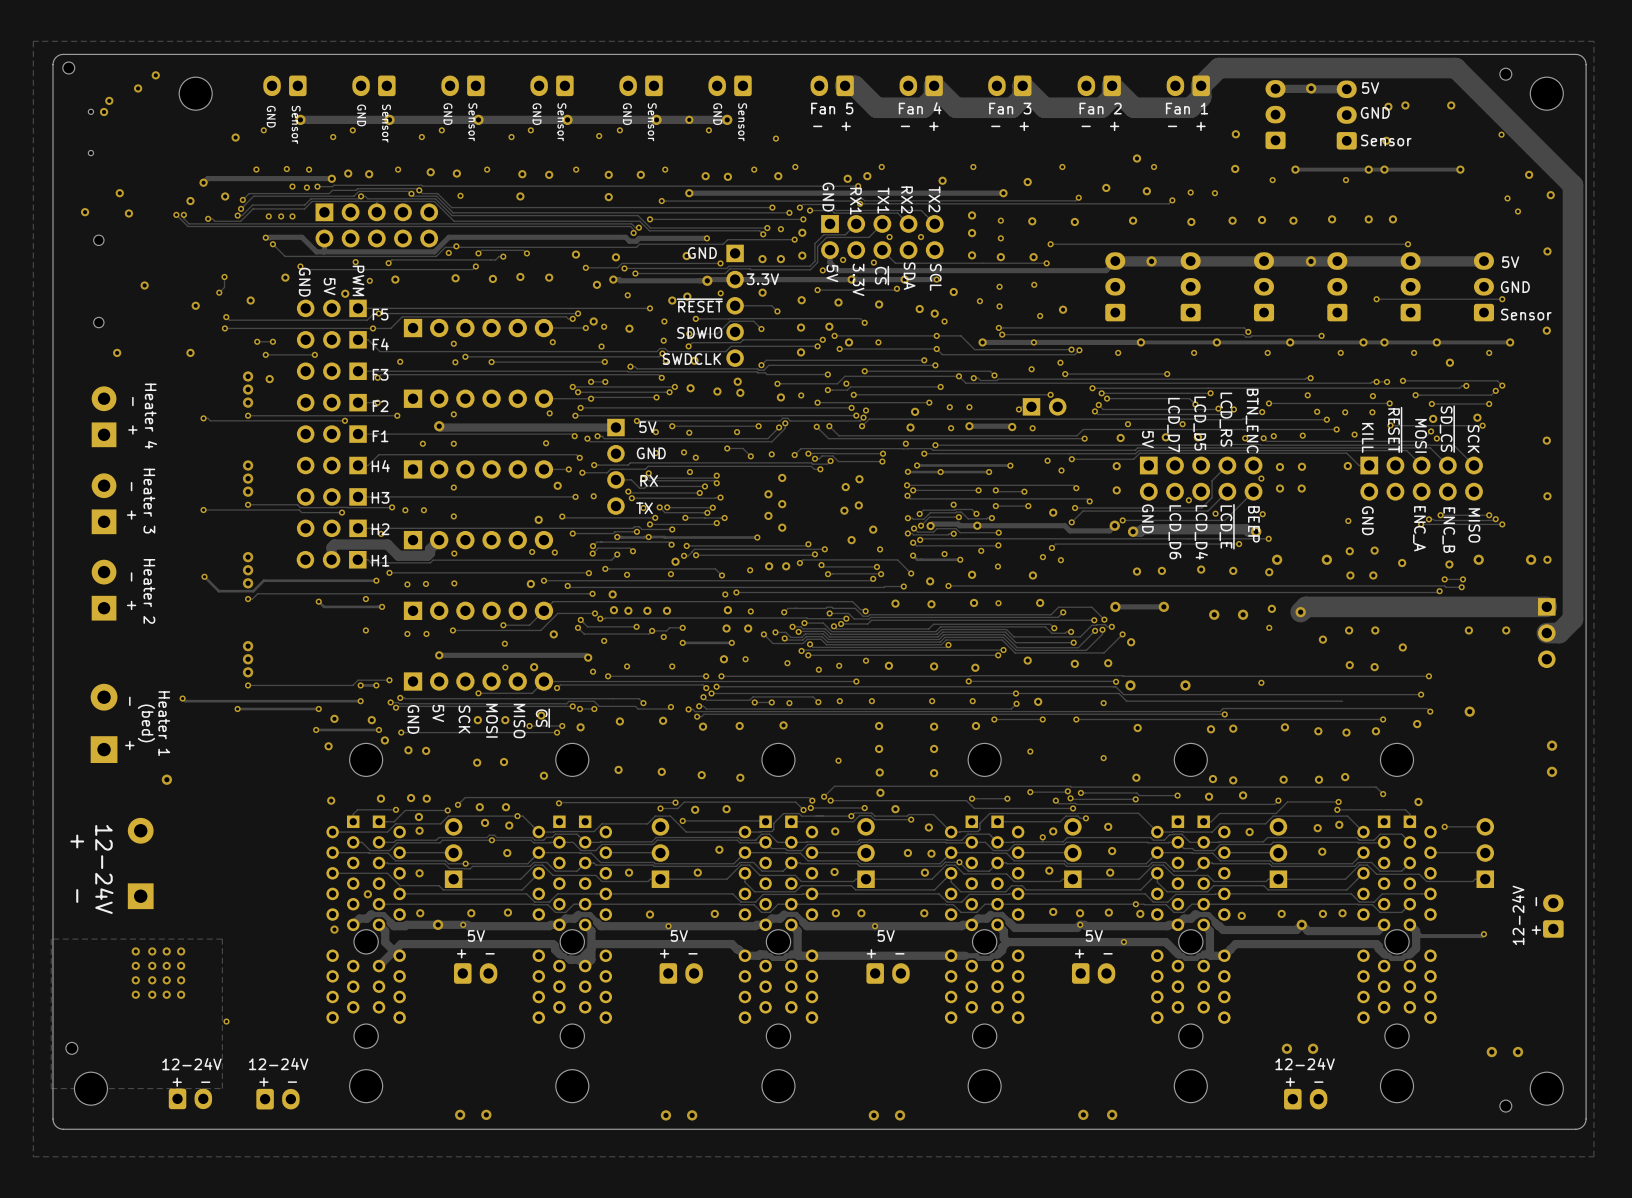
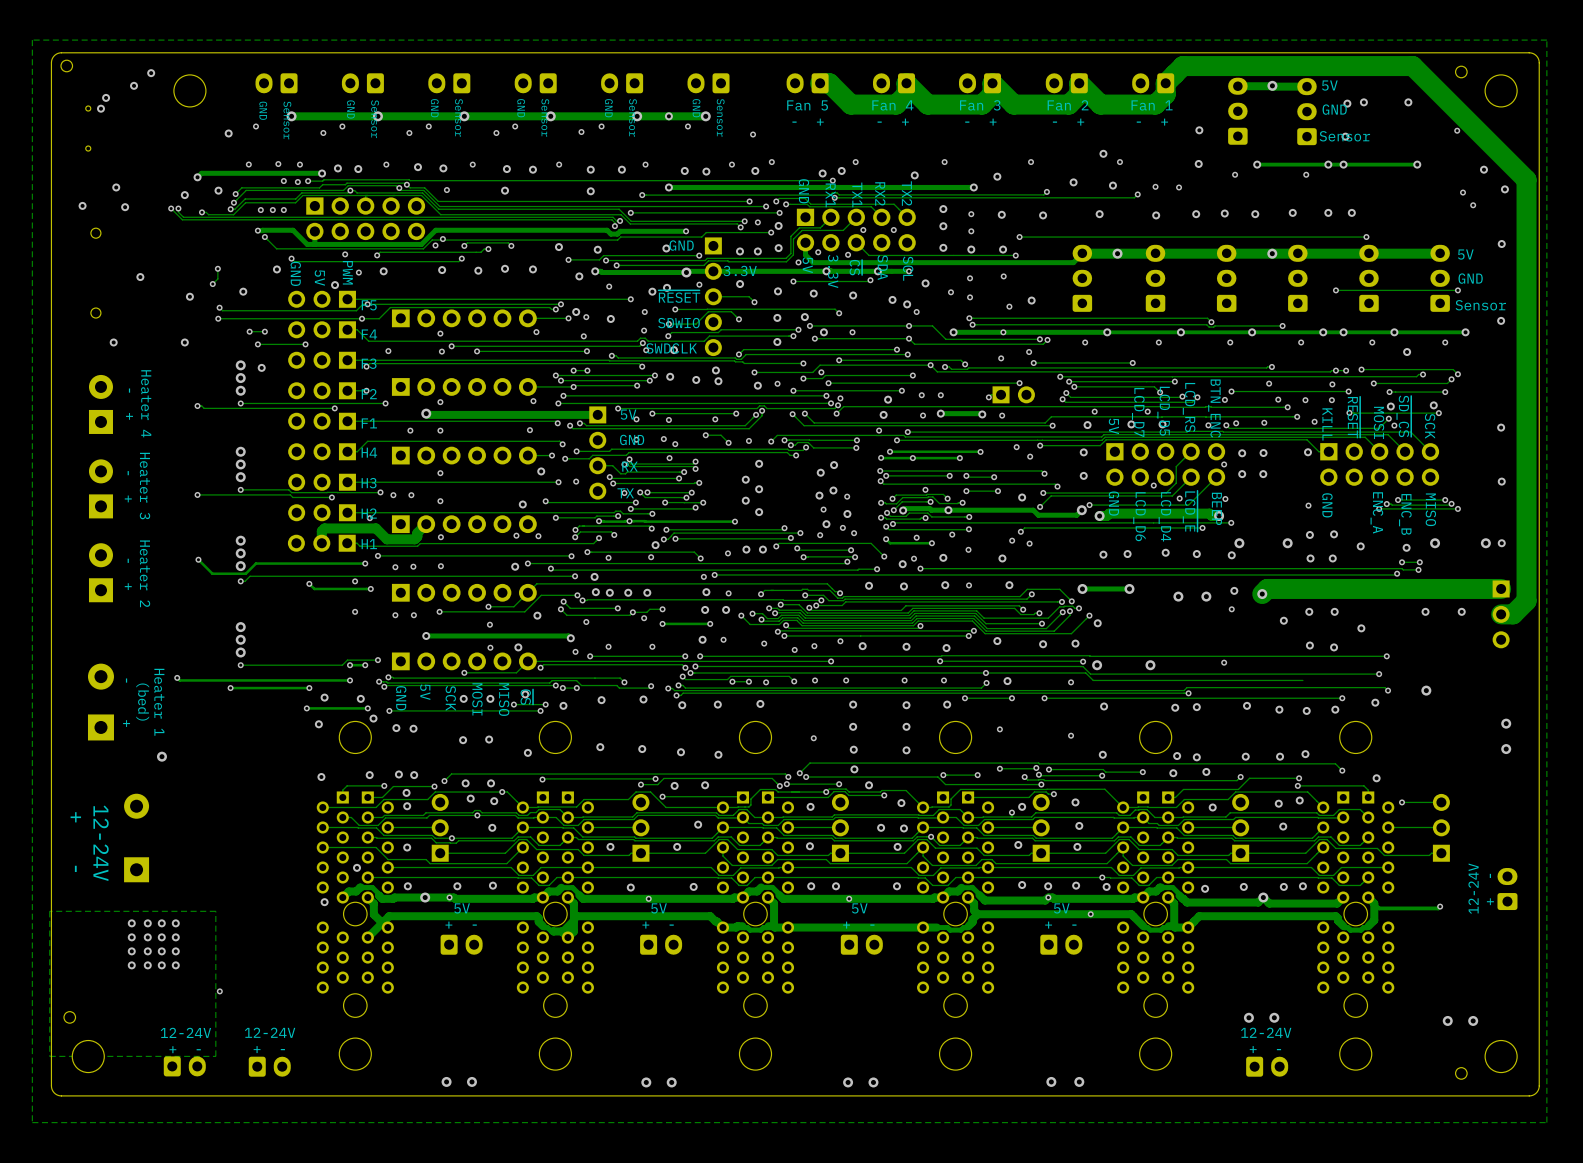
via: none -> (847, 496)
via: none -> (823, 509)
via: none -> (842, 527)
via: none -> (820, 535)
via: none -> (914, 558)

